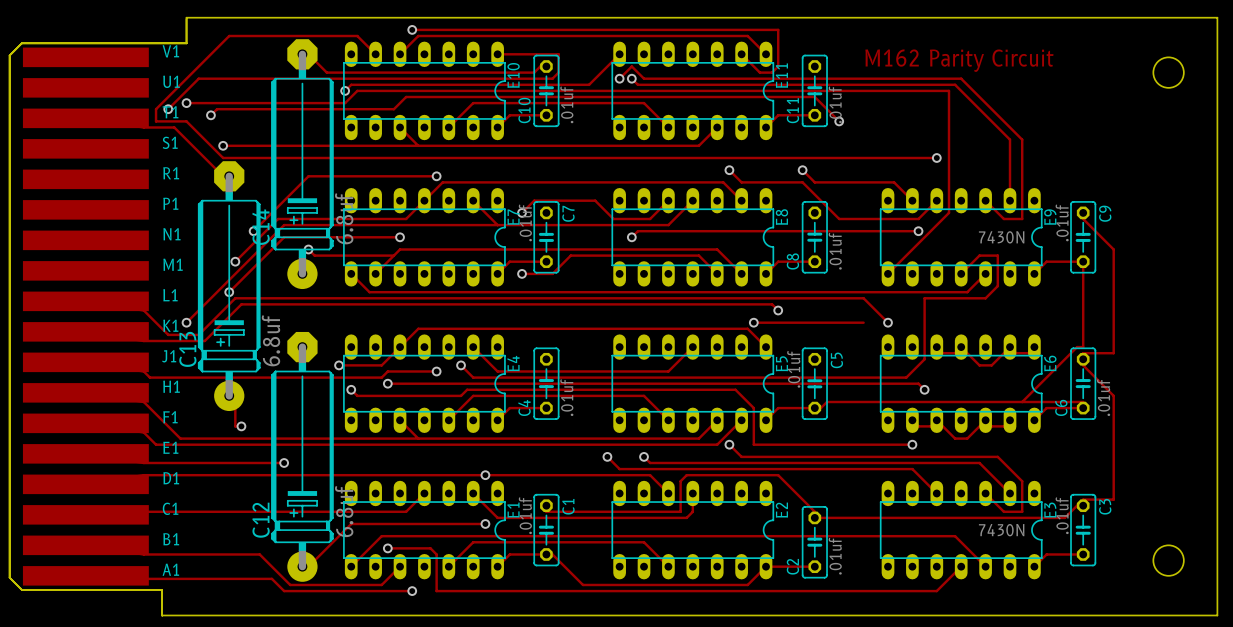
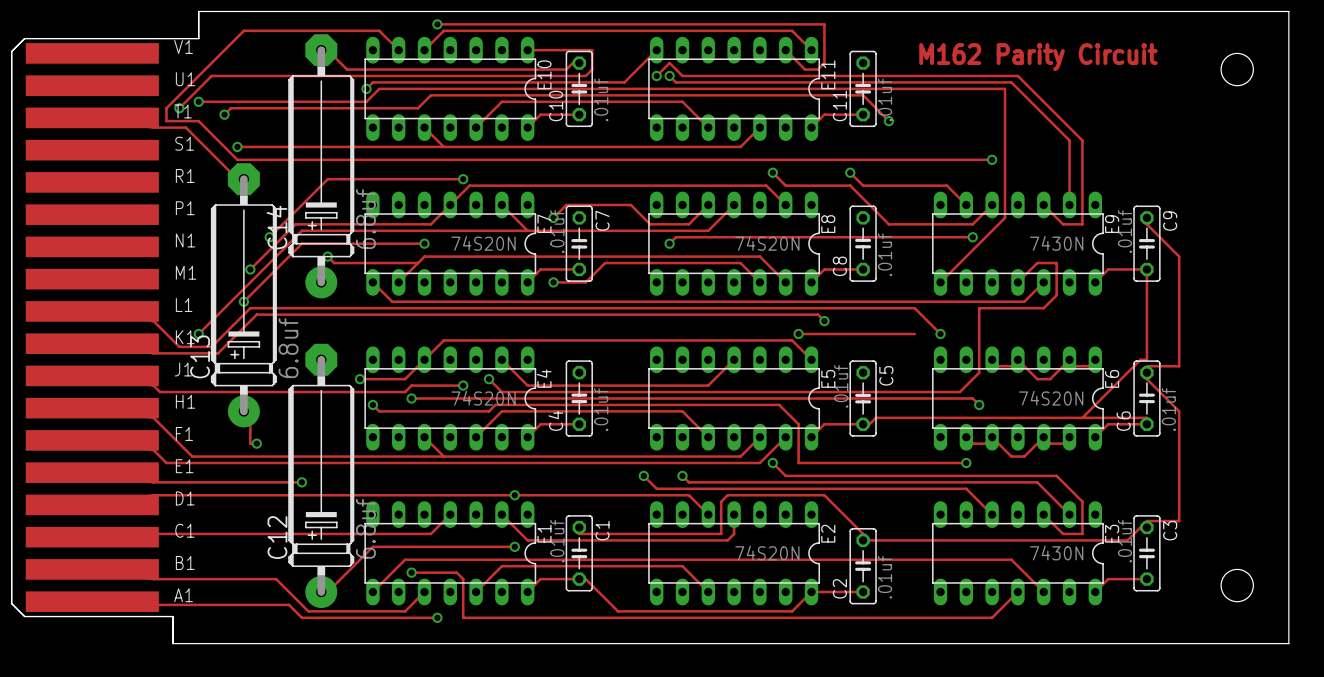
E7 value: none -> 74S20N (483, 243)
E8 value: none -> 74S20N (767, 243)
E4 value: none -> 74S20N (483, 398)
E6 value: none -> 74S20N (1051, 398)
E2 value: none -> 74S20N (767, 553)

